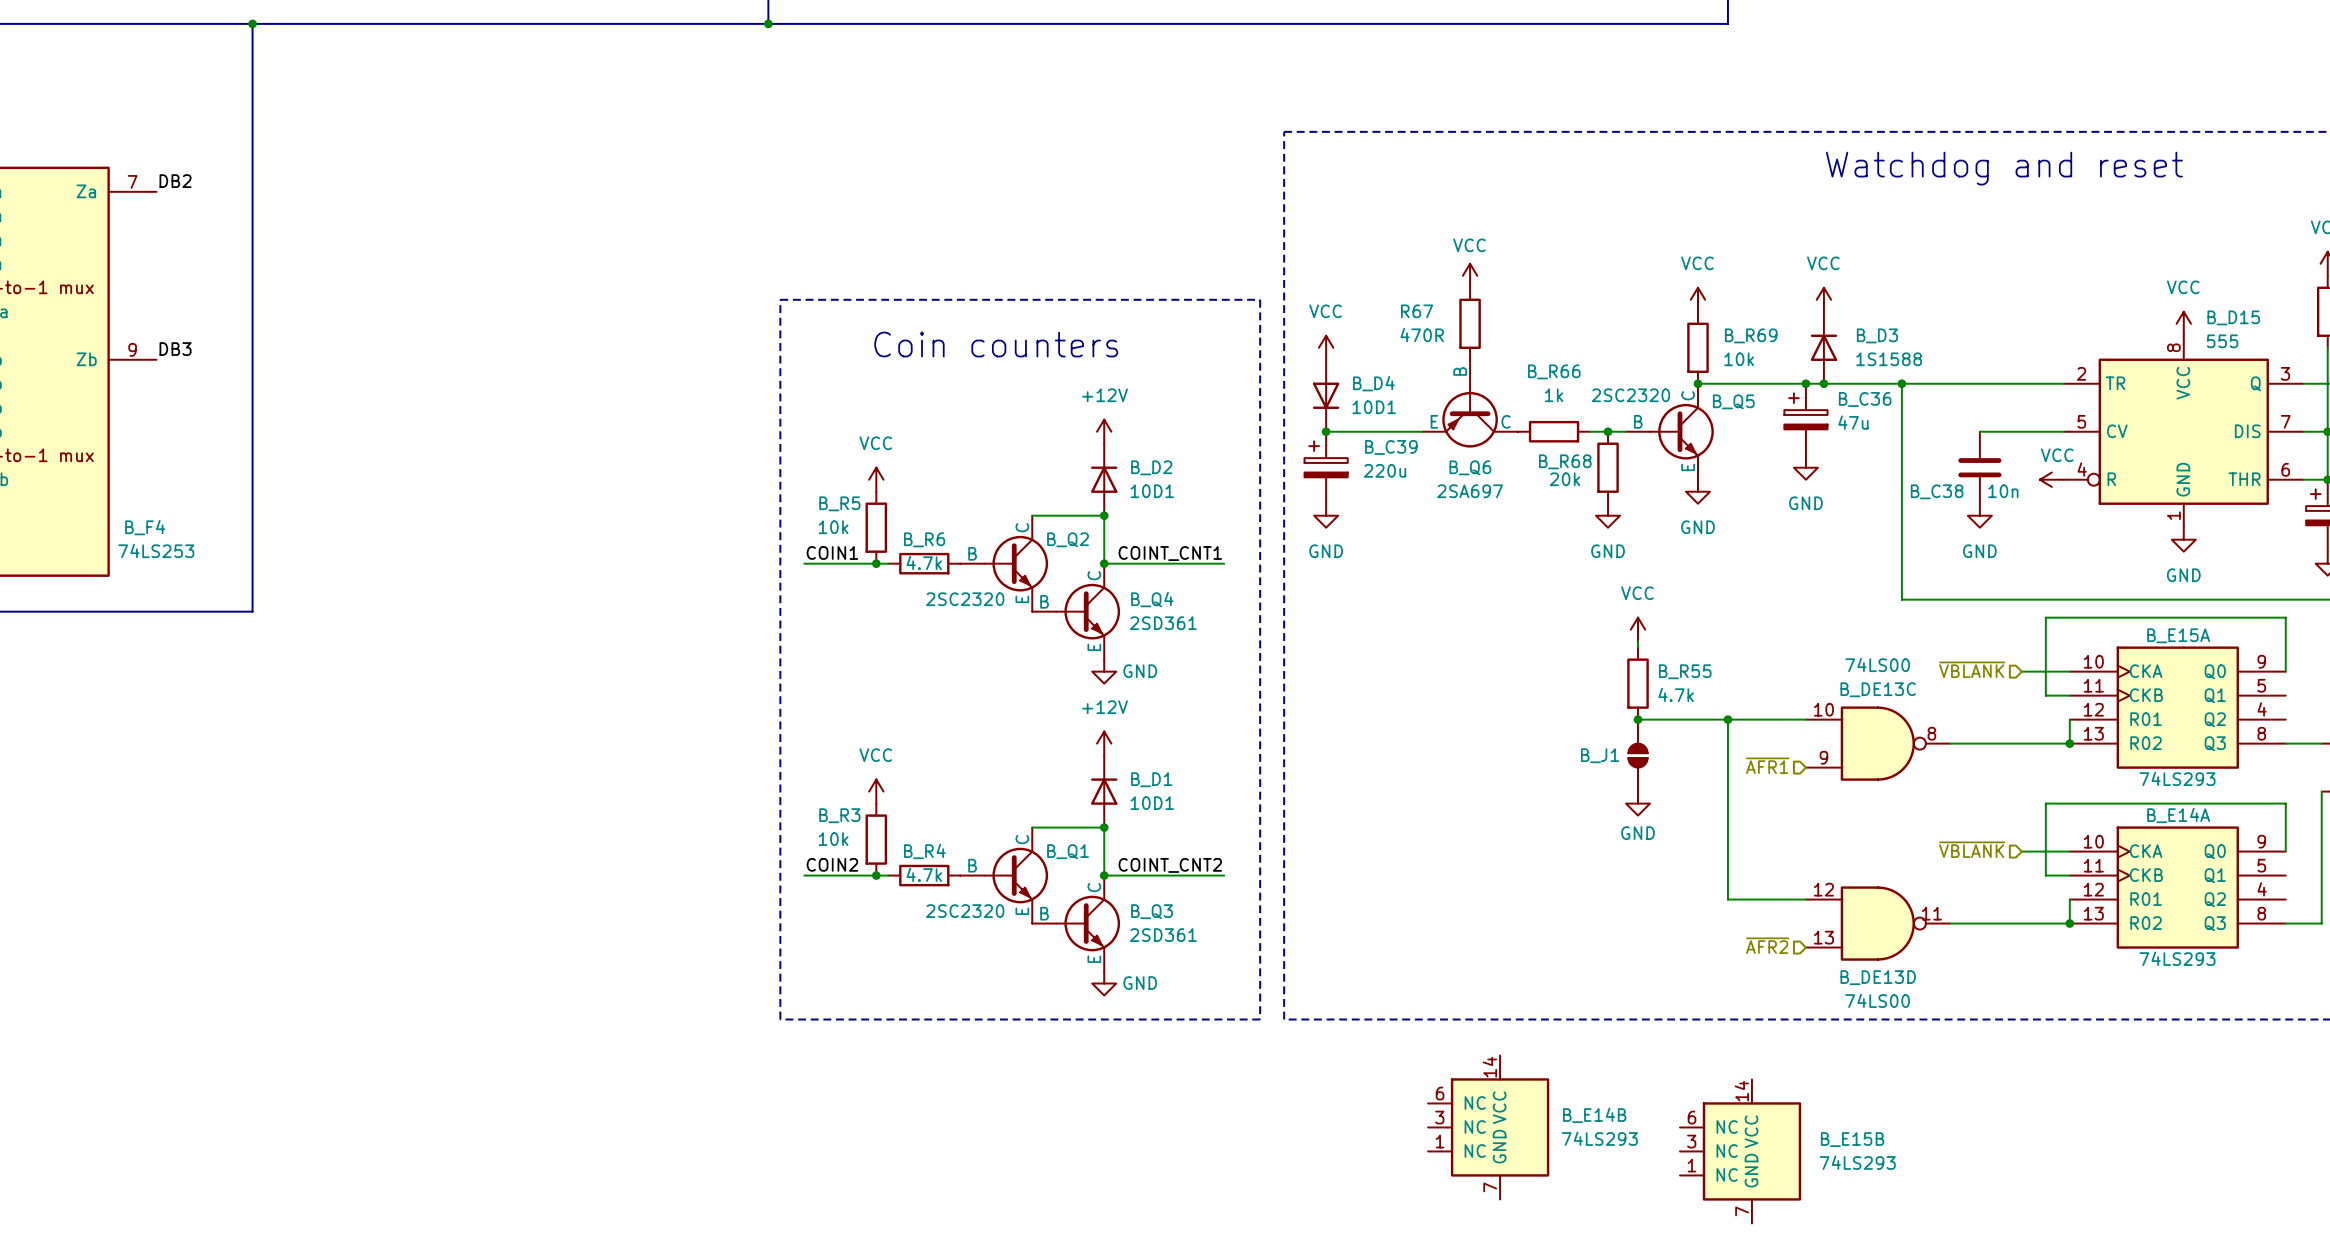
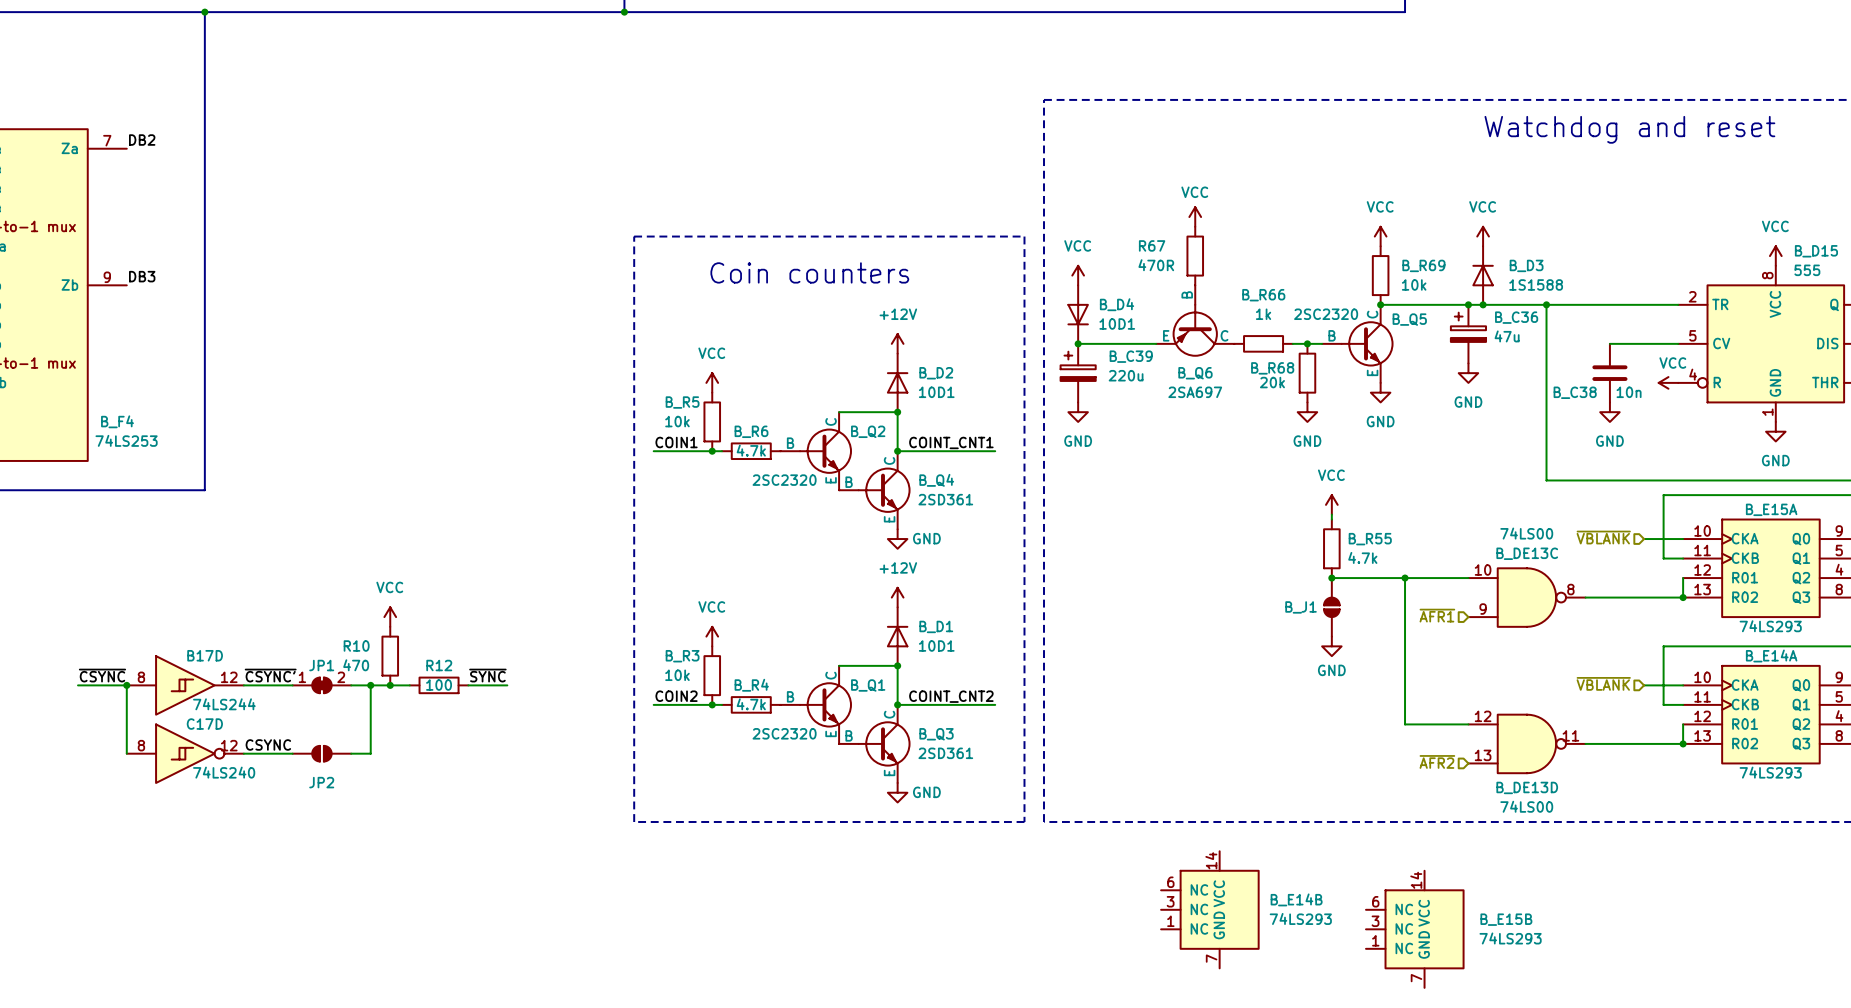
power symbol: none -> VCC (390, 617)
R10: none -> 470 (390, 656)
label: none -> ~{CSYNC} (102, 675)
label: none -> ~{CSYNC'} (270, 675)
label: none -> ~{SYNC} (487, 675)
wire: none -> (78, 685) (126, 685) (126, 753)
junction: none -> (126, 685)
B17D: none -> 74LS244 (185, 685)
wire: none -> (243, 685) (292, 685)
JP1: none -> (321, 685)
wire: none -> (351, 685) (409, 685)
wire: none -> (370, 685) (370, 753) (351, 753)
junction: none -> (370, 685)
junction: none -> (390, 685)
R12: none -> 100 (439, 685)
wire: none -> (468, 685) (507, 685)
label: none -> CSYNC (268, 744)
C17D: none -> 74LS240 (185, 753)
wire: none -> (243, 753) (292, 753)
JP2: none -> (321, 753)

